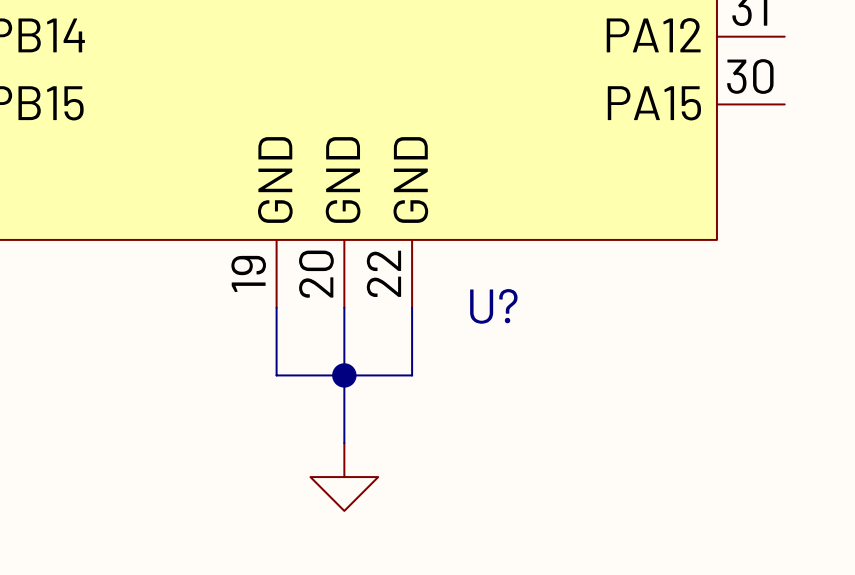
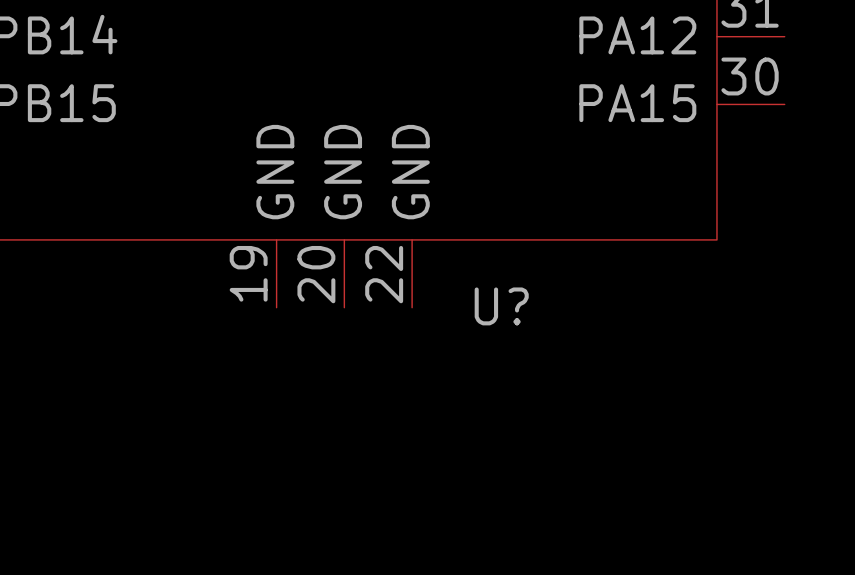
wire: (276, 307) (276, 375) (412, 375) (412, 307) -> none
wire: (344, 307) (344, 443) -> none
junction: (344, 375) -> none
power symbol: (344, 477) -> none

